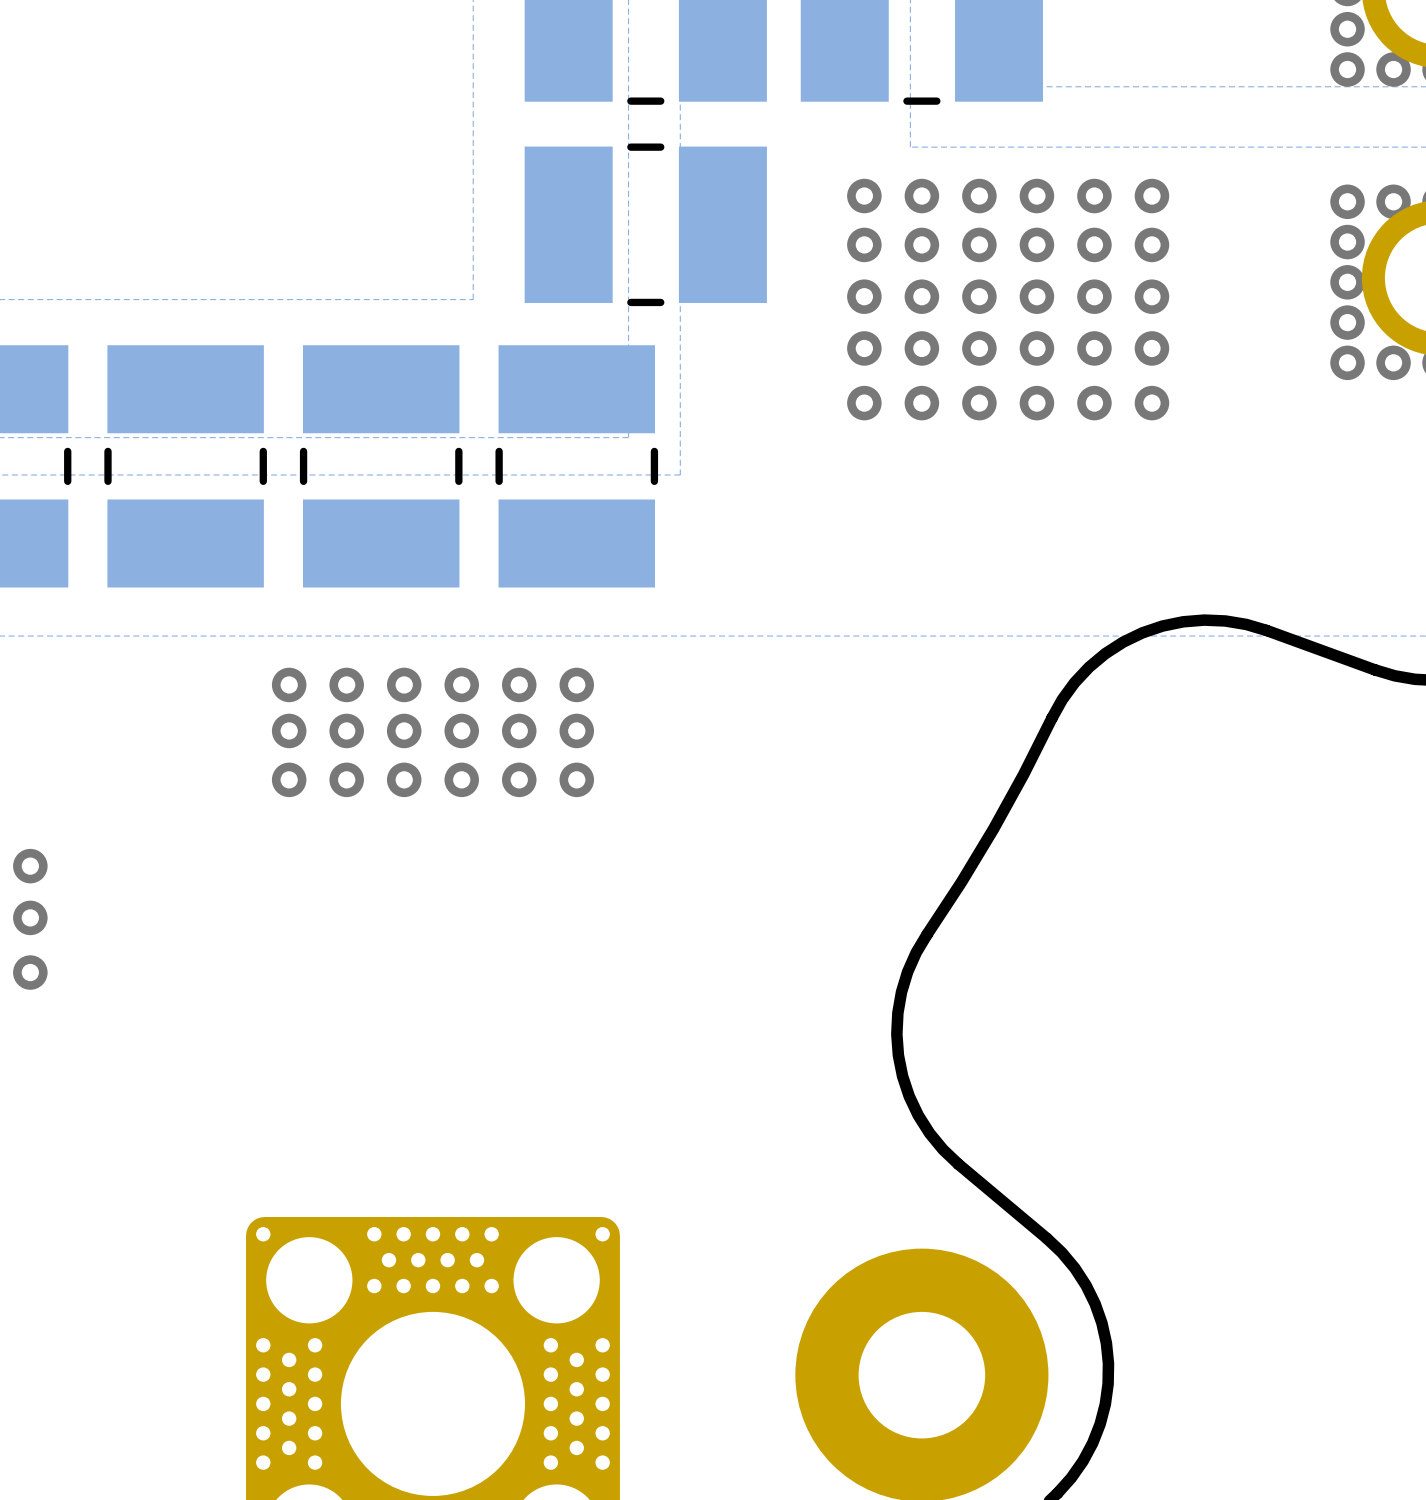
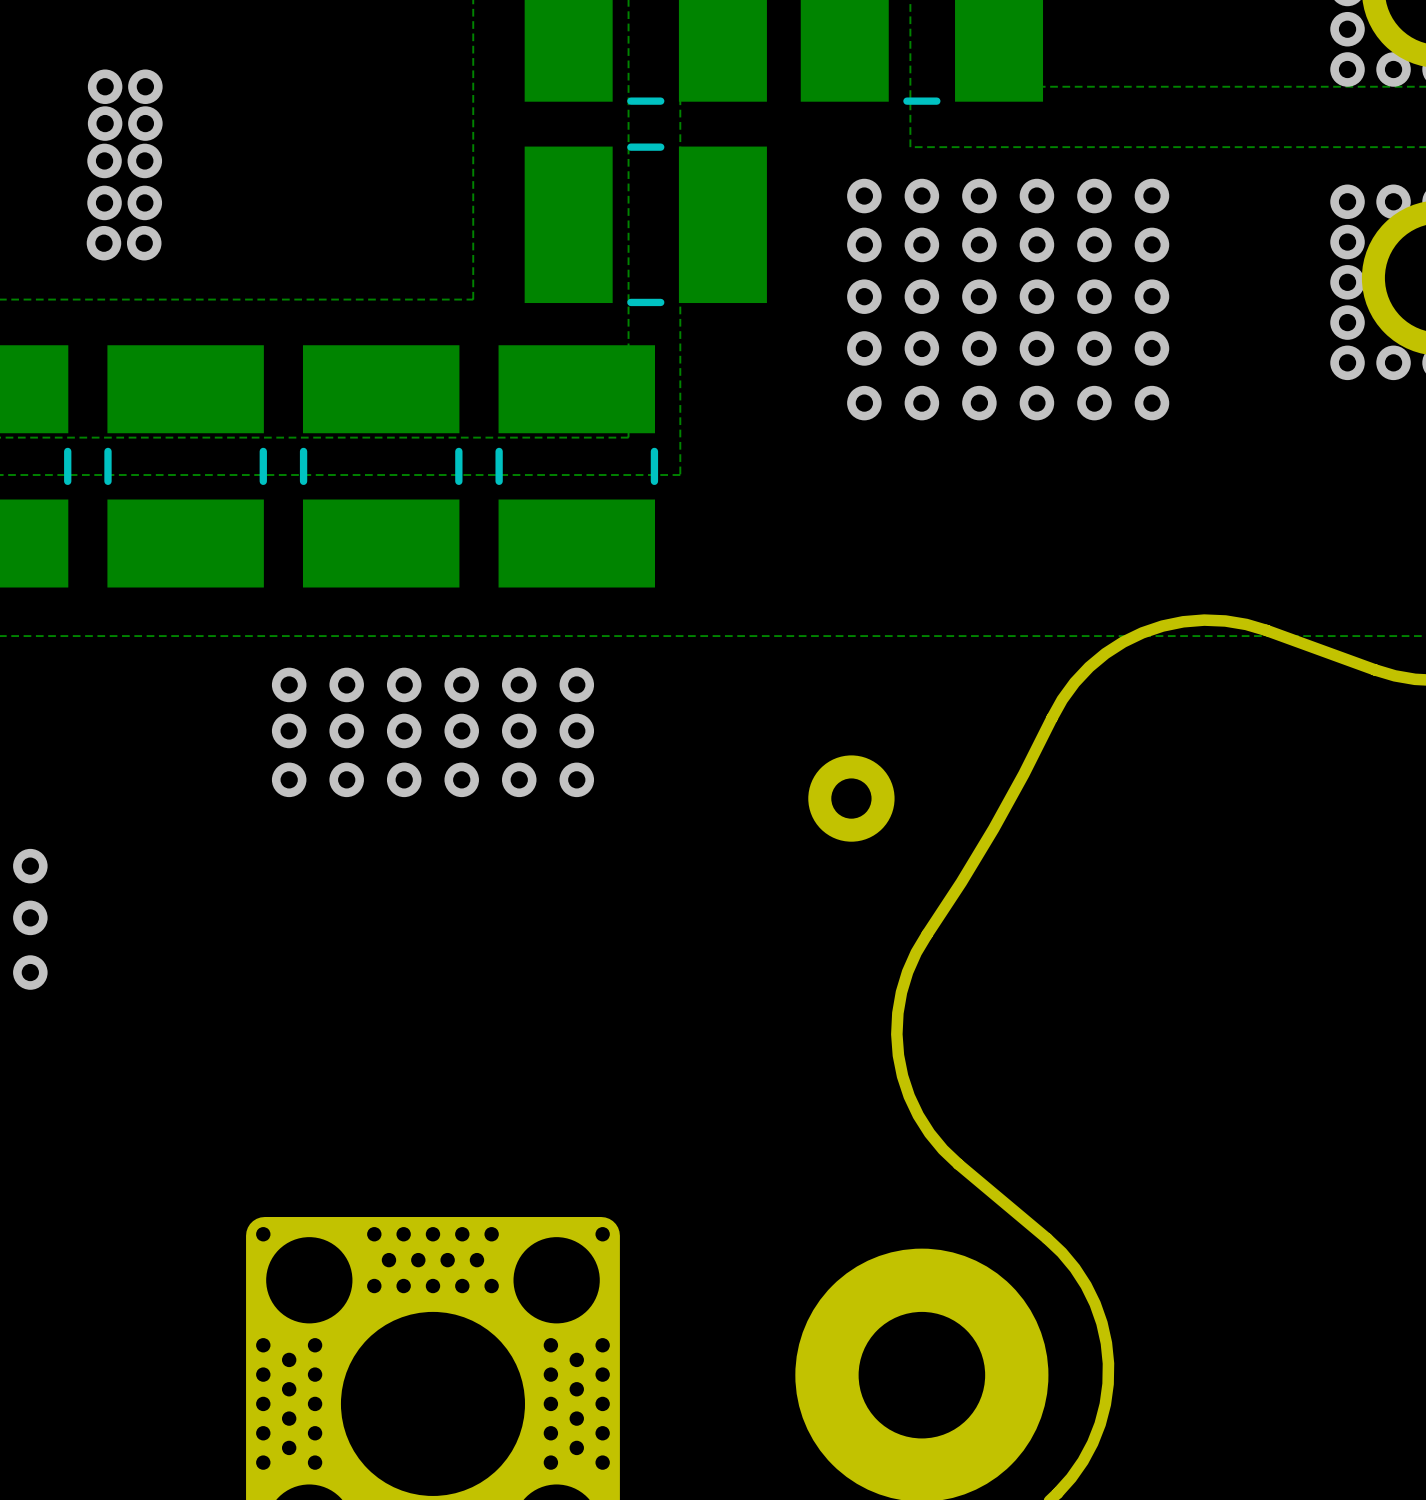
via: none -> (105, 86)
via: none -> (145, 86)
via: none -> (105, 123)
via: none -> (145, 123)
via: none -> (104, 160)
via: none -> (144, 160)
via: none -> (104, 202)
via: none -> (144, 202)
via: none -> (103, 243)
via: none -> (144, 243)
part: none -> (851, 798)

